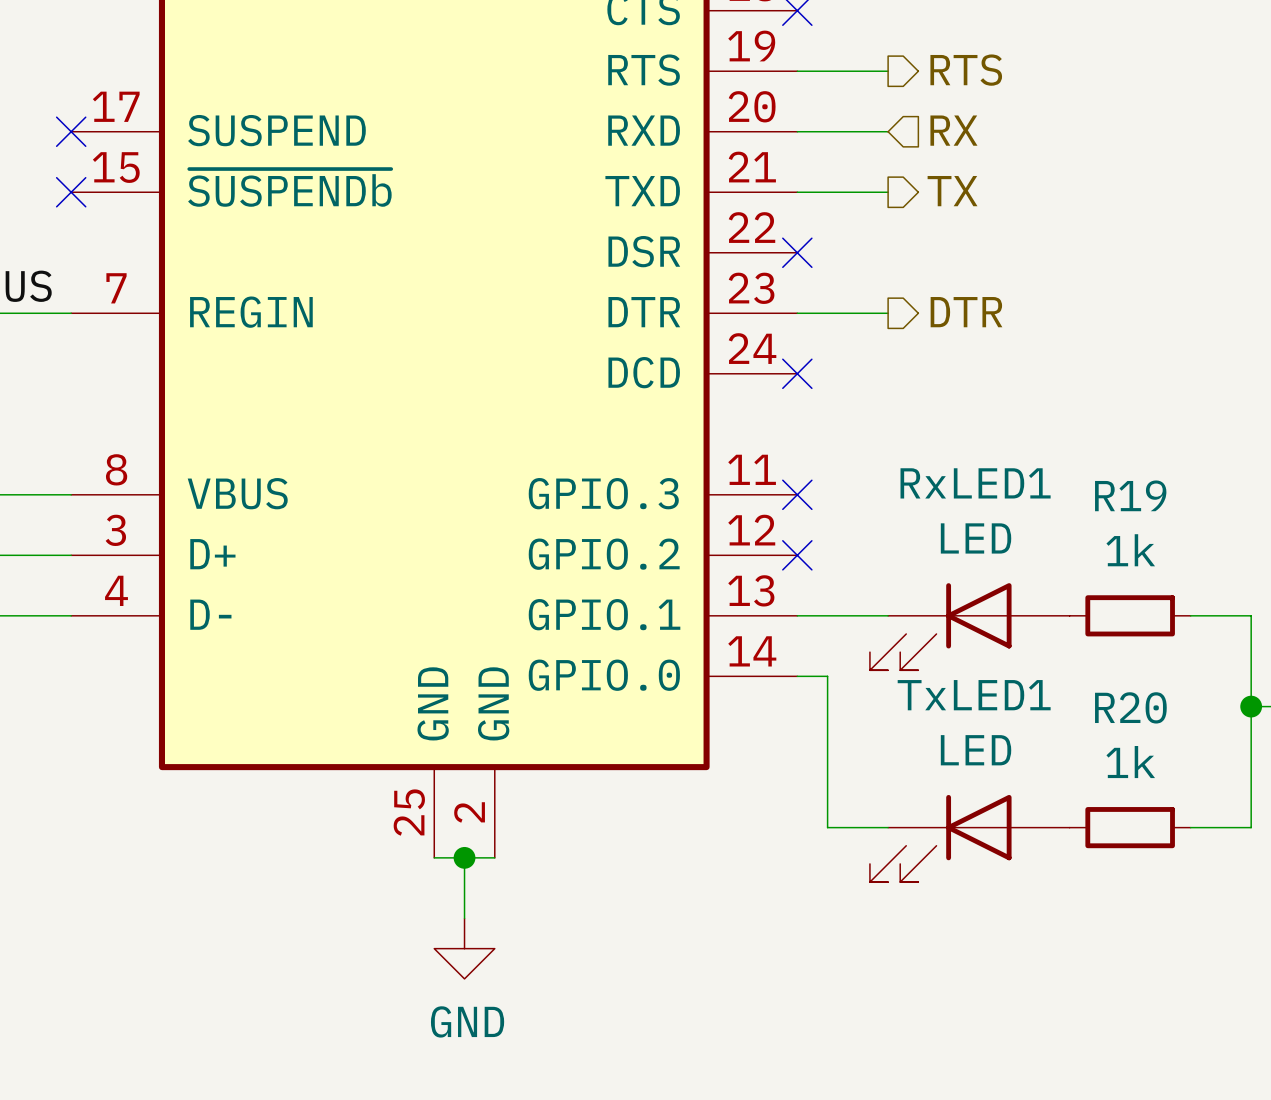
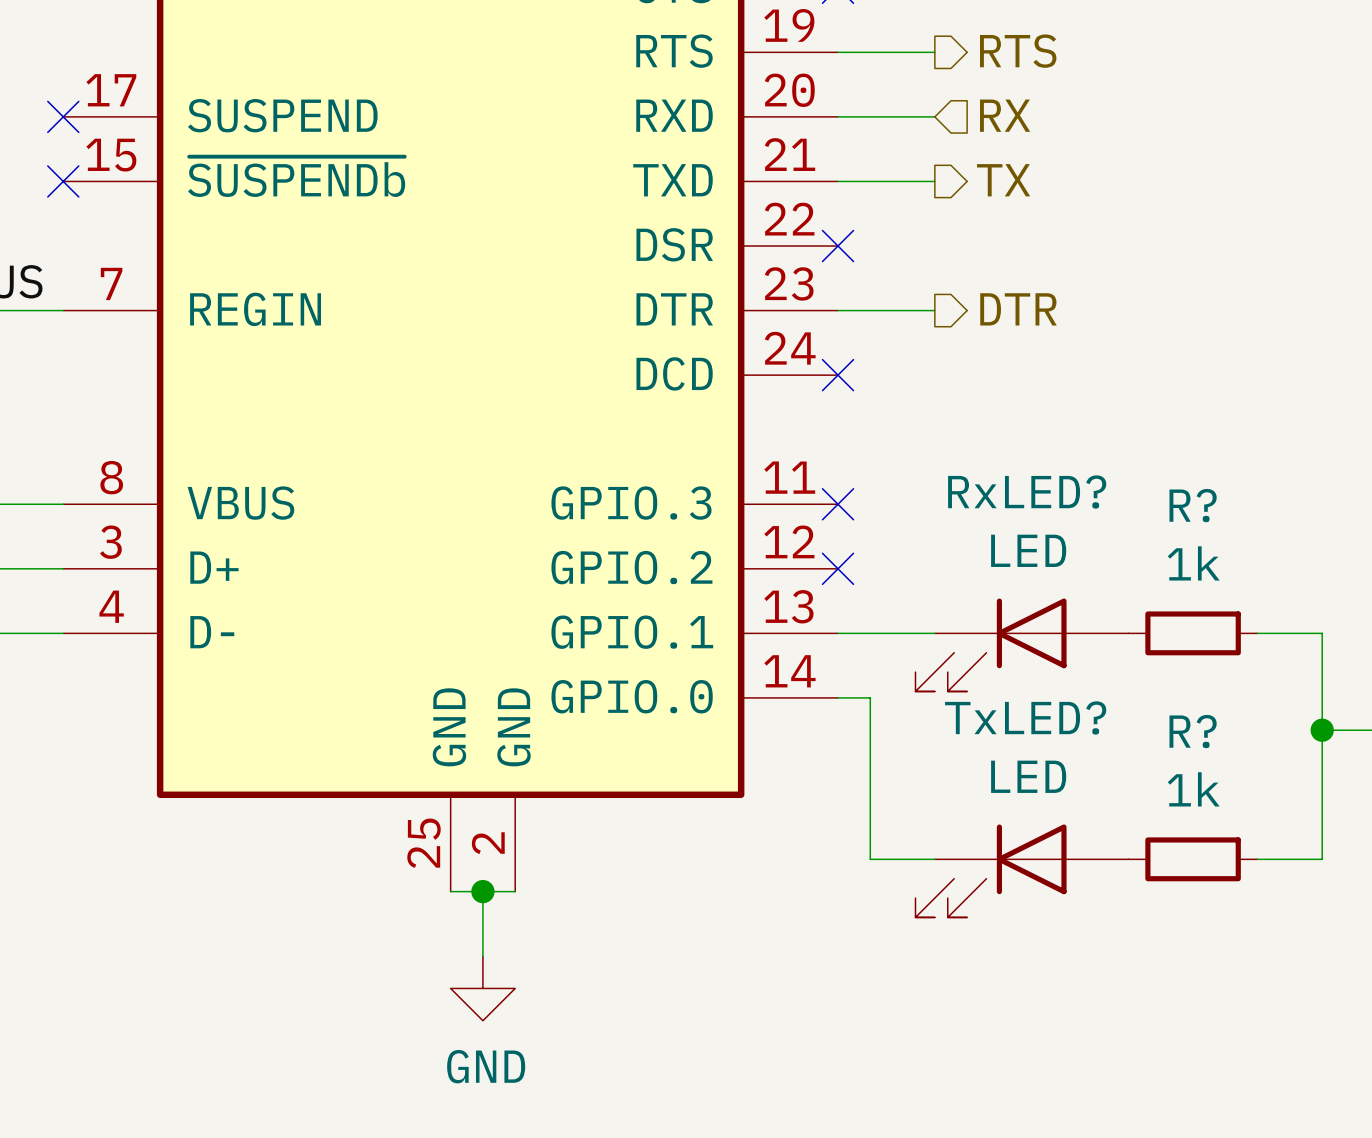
RxLED1 name: RxLED1 (975, 483) -> RxLED? (1027, 492)
R19 name: R19 (1130, 495) -> R? (1193, 505)
TxLED1 name: TxLED1 (974, 695) -> TxLED? (1025, 717)
R20 name: R20 (1130, 707) -> R? (1193, 731)

